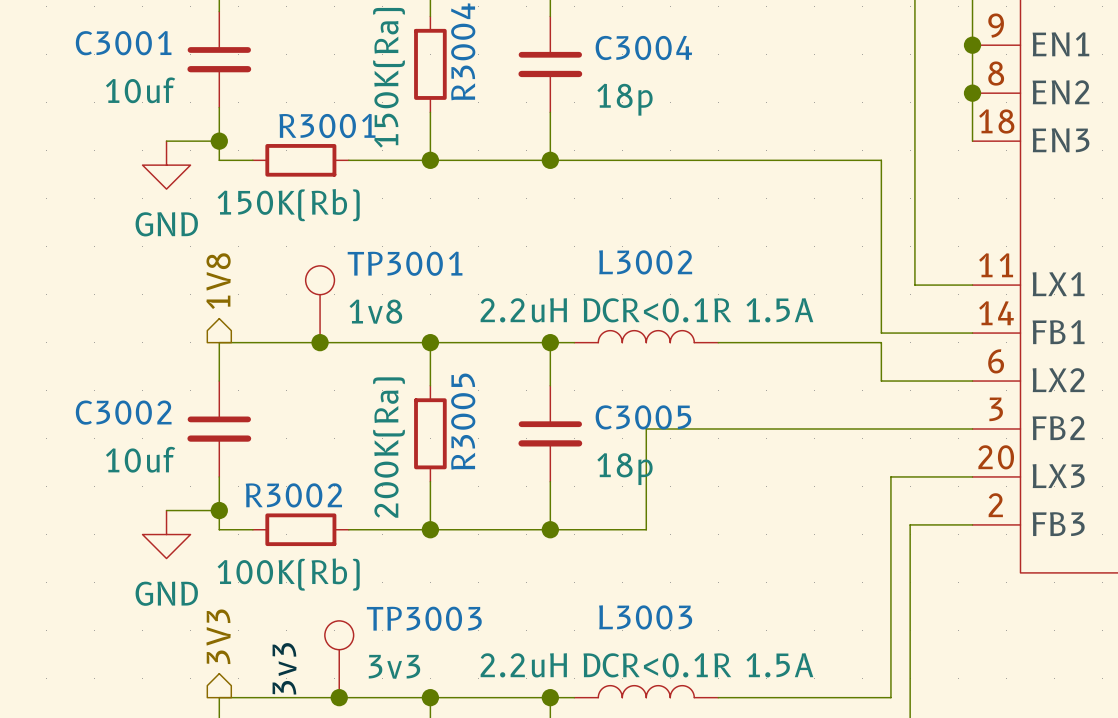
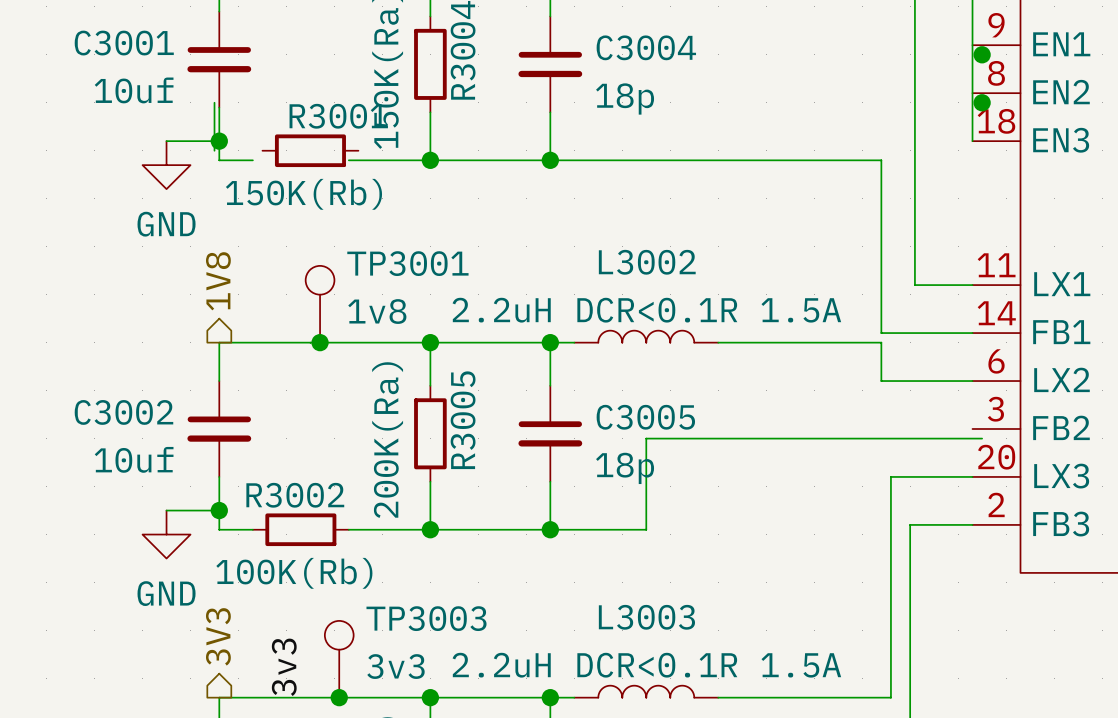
junction position: (972, 45) -> (982, 54)
junction position: (972, 93) -> (982, 102)
wire: none -> (214, 102) (214, 150)
R3001 position: (300, 160) -> (310, 150)
wire: (972, 428) (646, 428) (646, 438) -> (982, 438) (646, 438)

